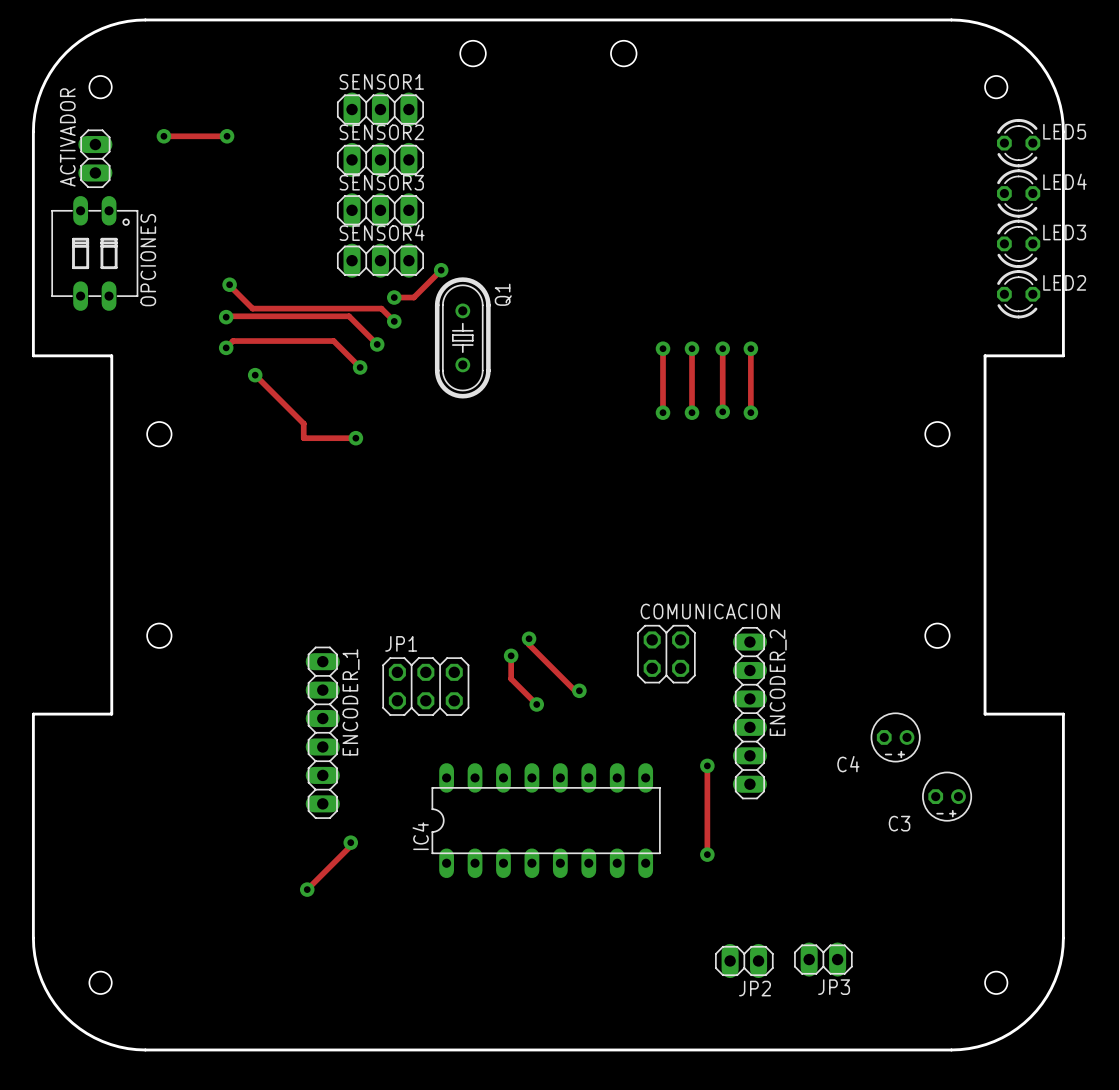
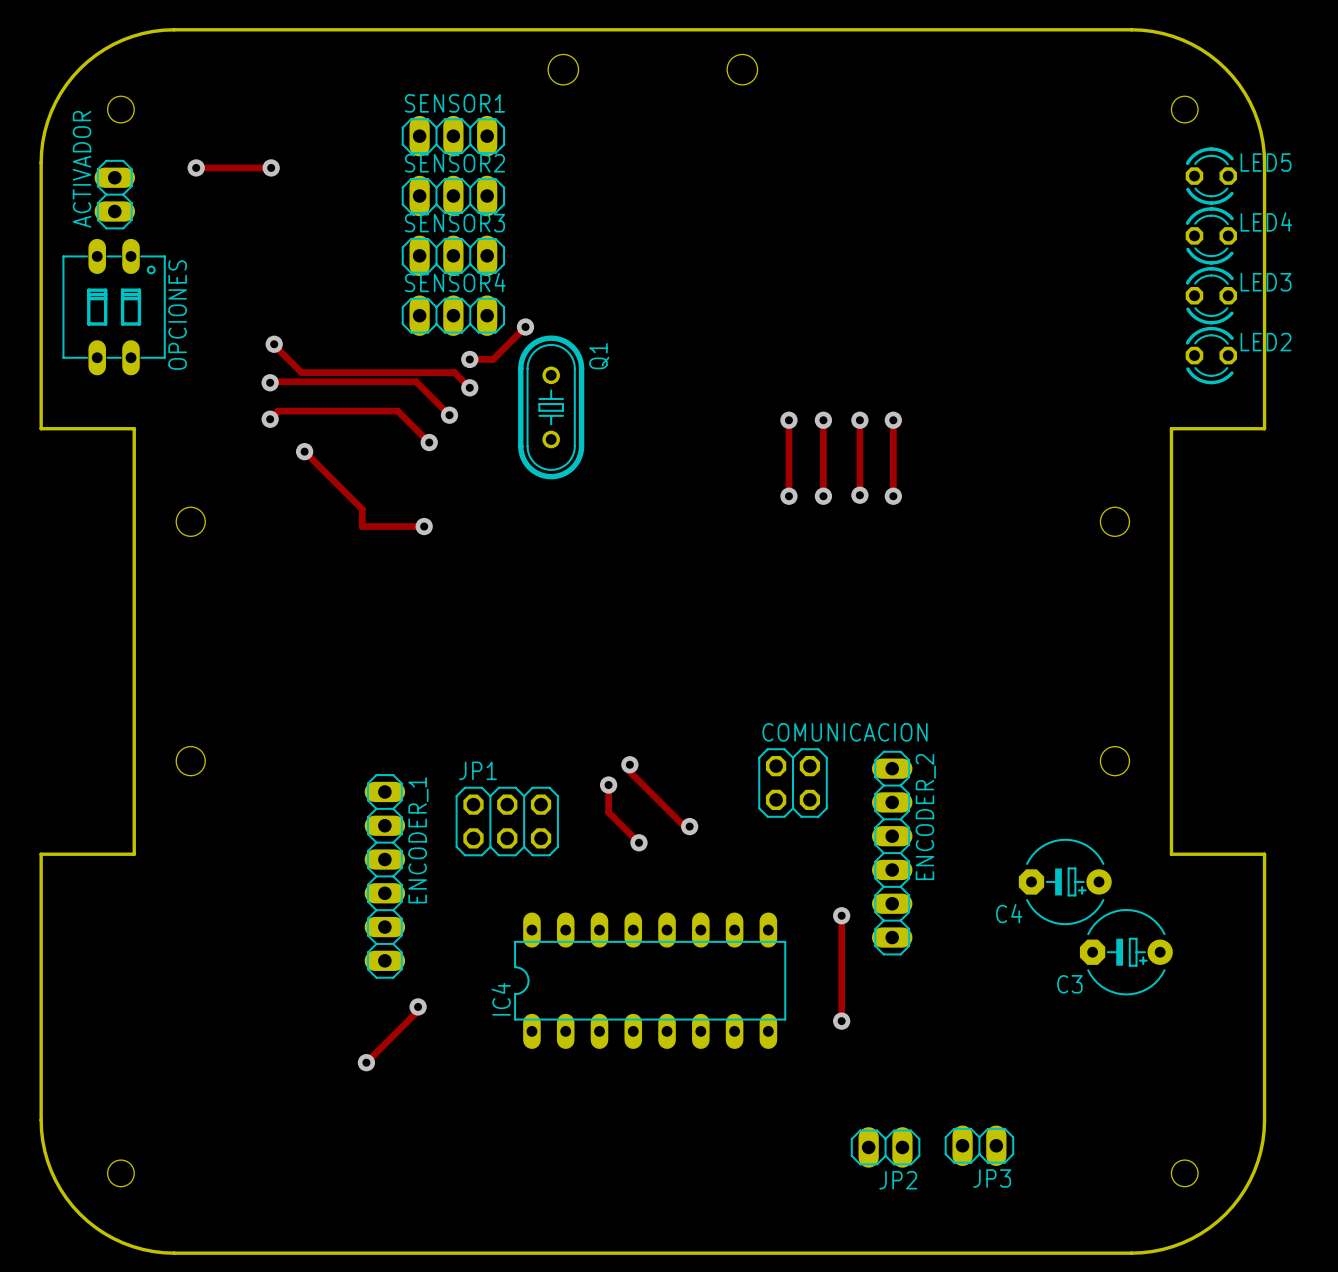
C4 footprint: [870, 712, 921, 763] -> [1018, 838, 1112, 926]
C3 footprint: [922, 771, 973, 822] -> [1079, 908, 1173, 996]

